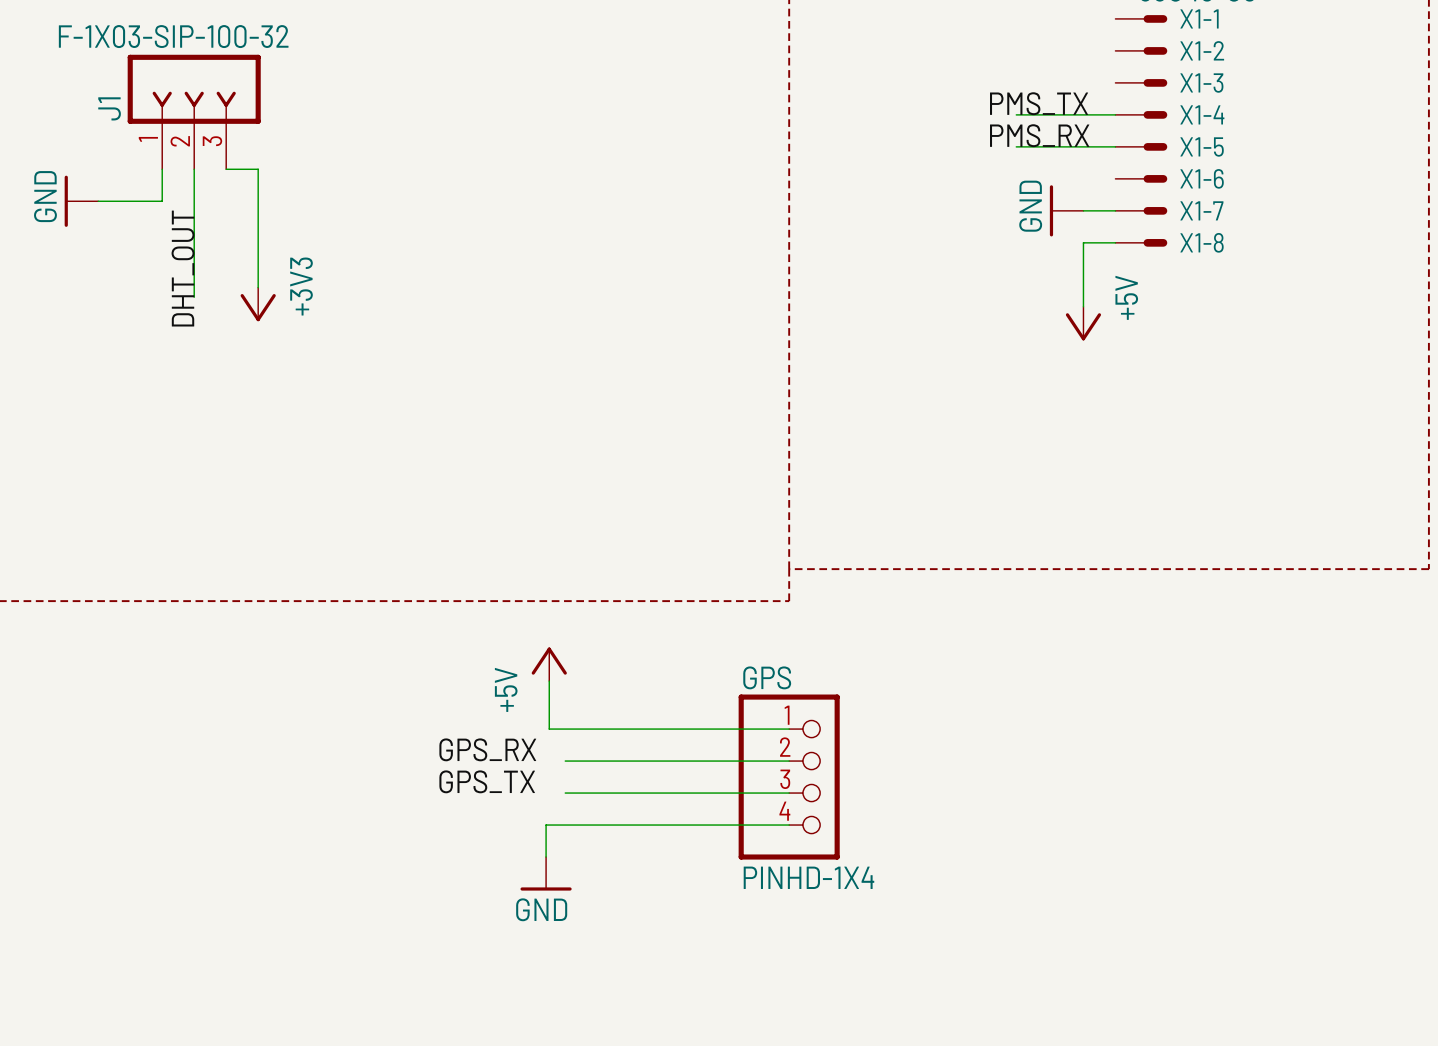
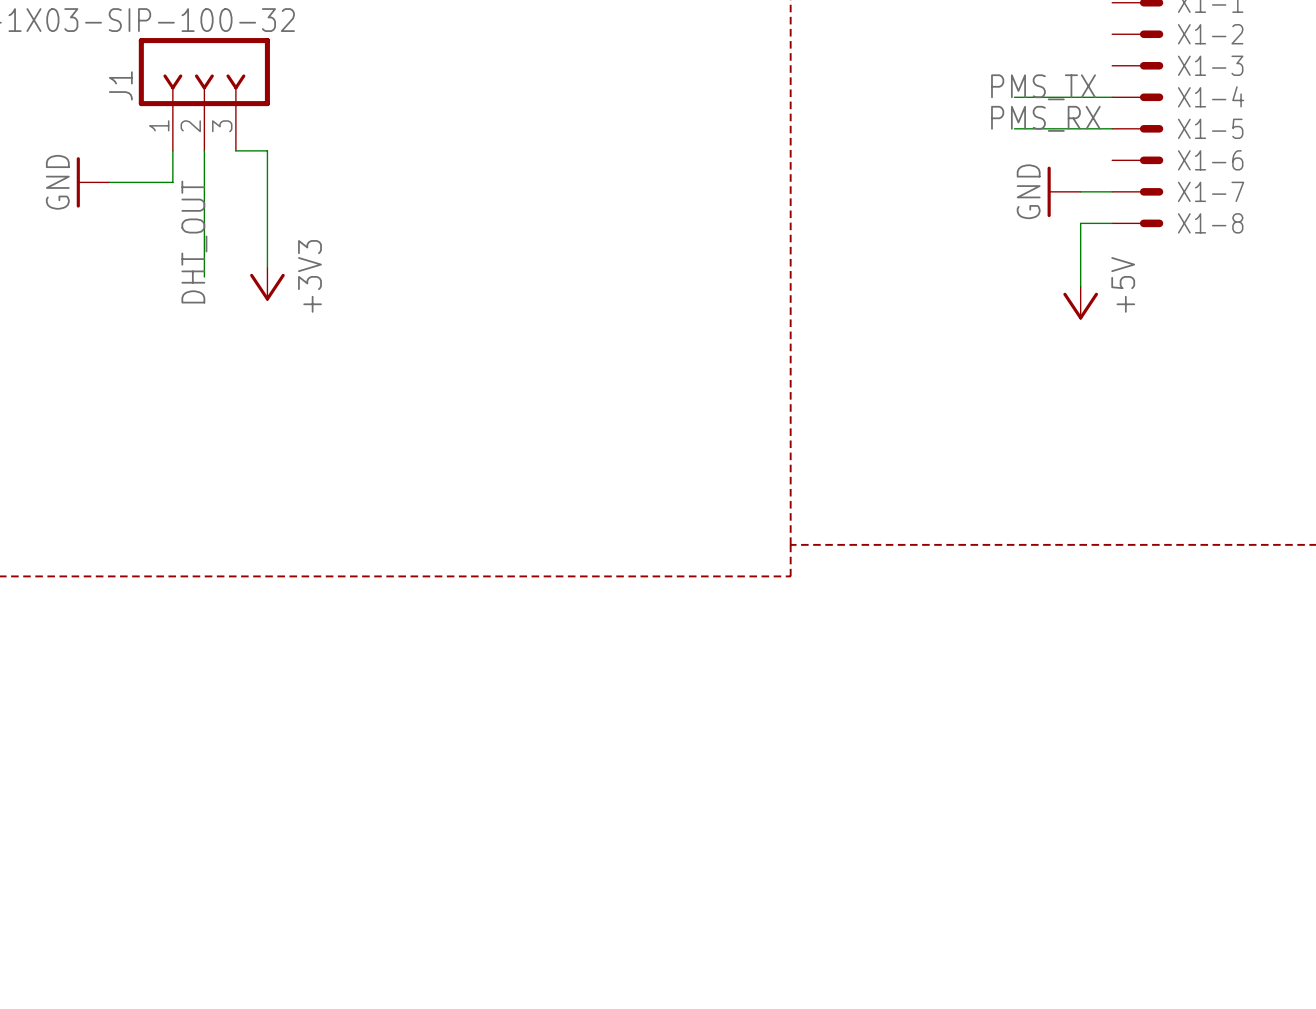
power symbol: +5V (549, 664) -> none
wire: (549, 681) (549, 729) (789, 729) -> none
label: GPS_RX (487, 749) -> none
wire: (565, 761) (789, 761) -> none
GPS: PINHD-1X4 (789, 777) -> none
label: GPS_TX (487, 781) -> none
wire: (565, 793) (789, 793) -> none
wire: (789, 825) (546, 825) (546, 857) -> none
power symbol: GND (546, 873) -> none

